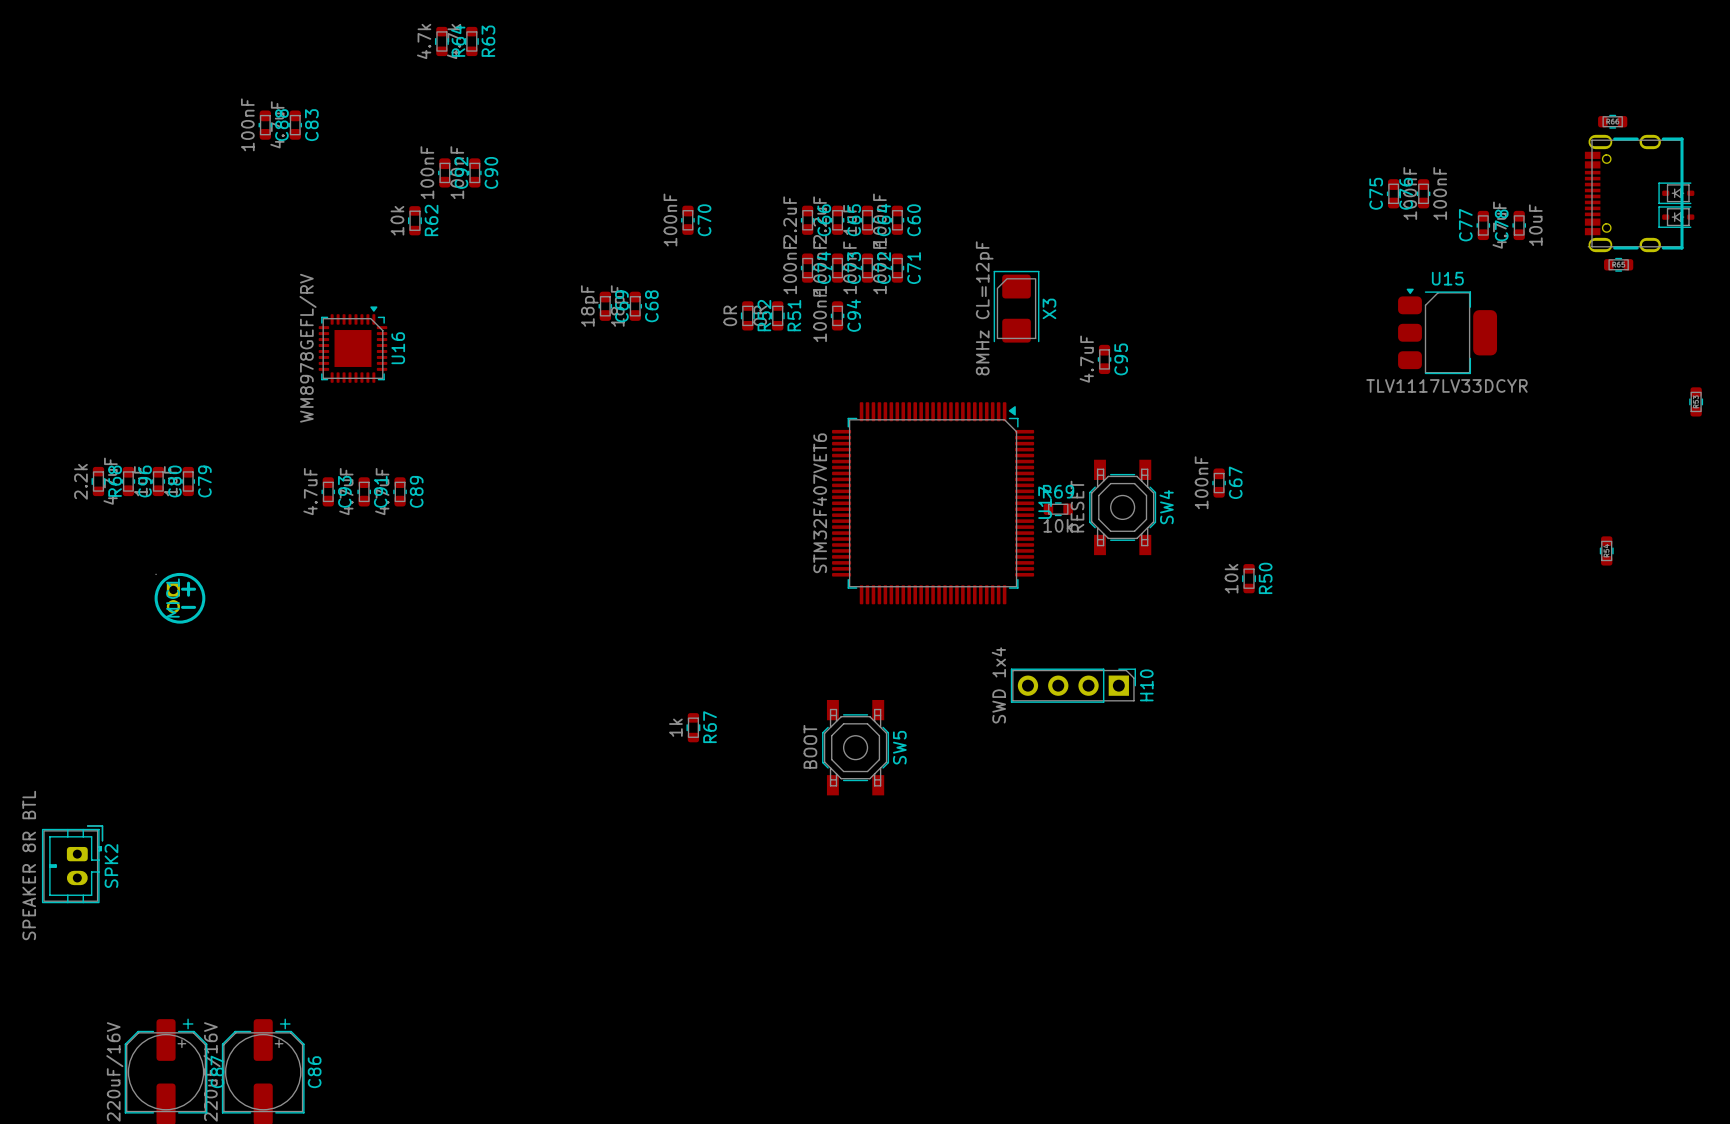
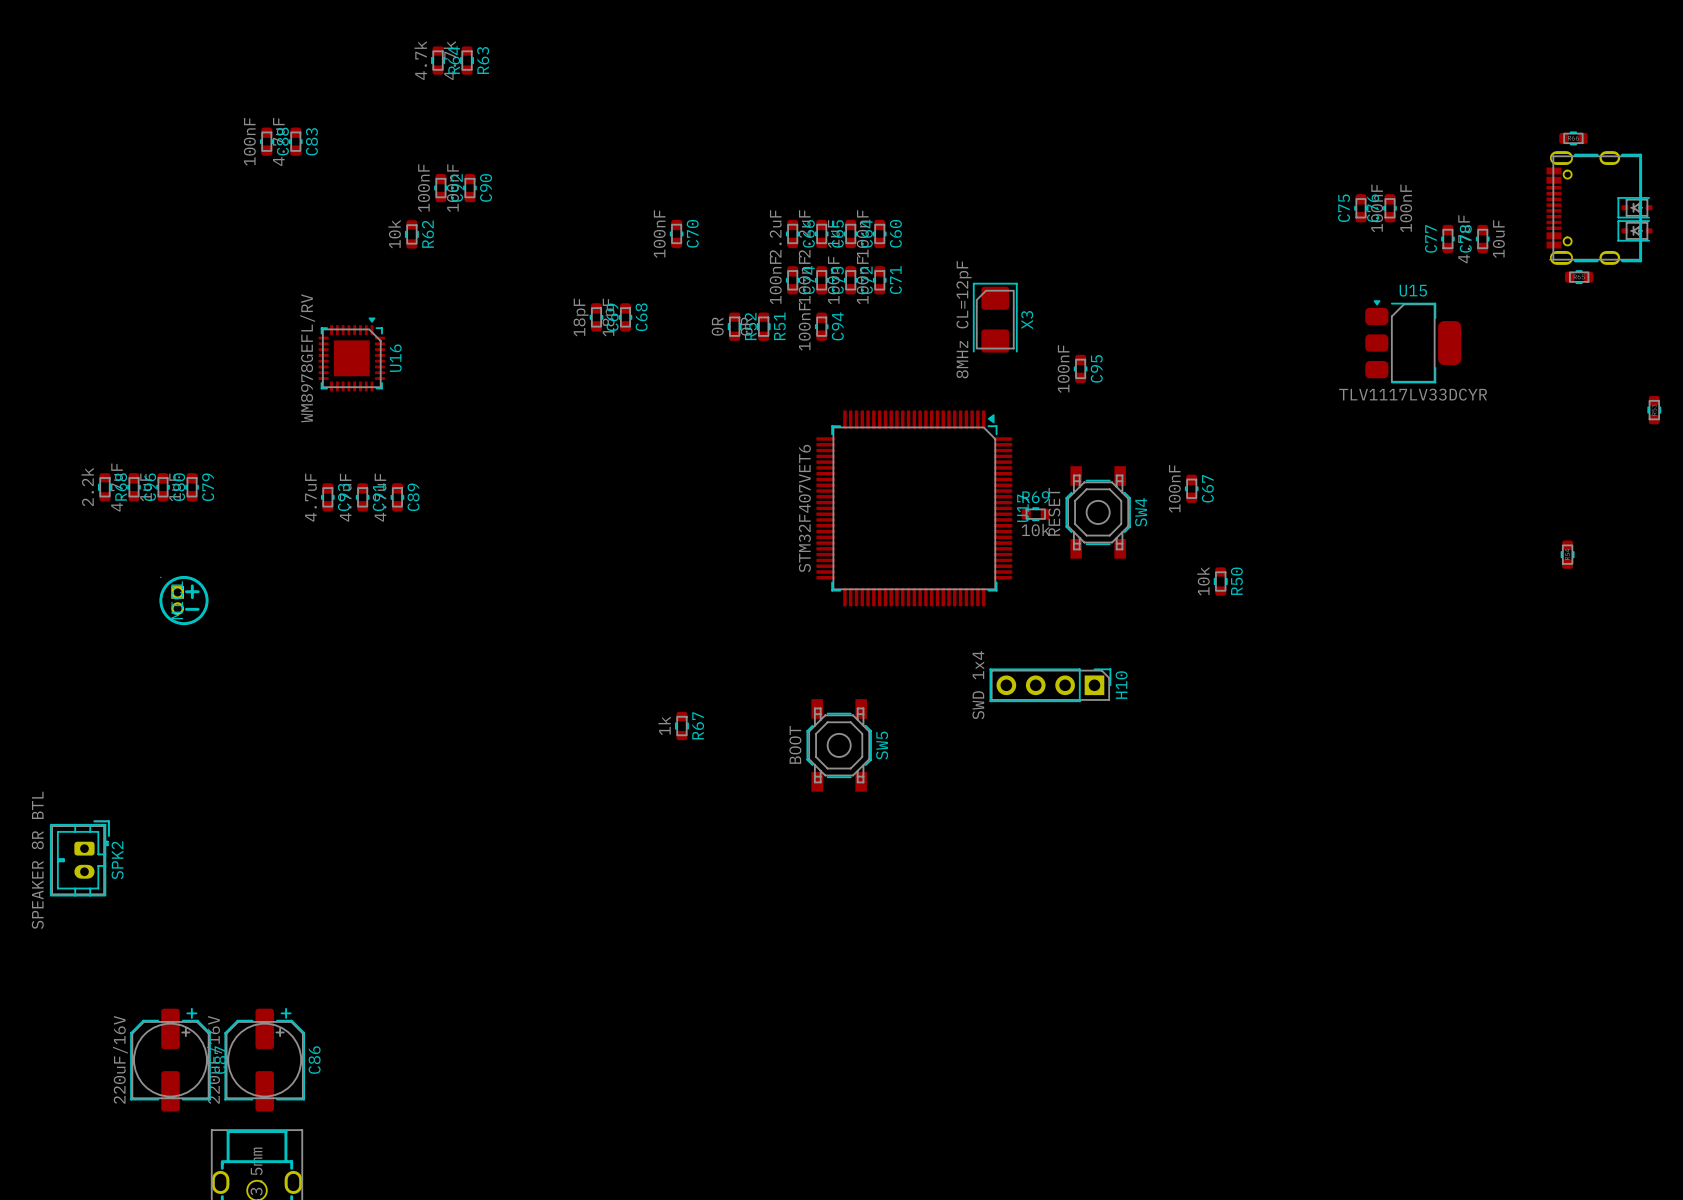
C95 value: 4.7uF (1086, 359) -> 100nF (1063, 369)

